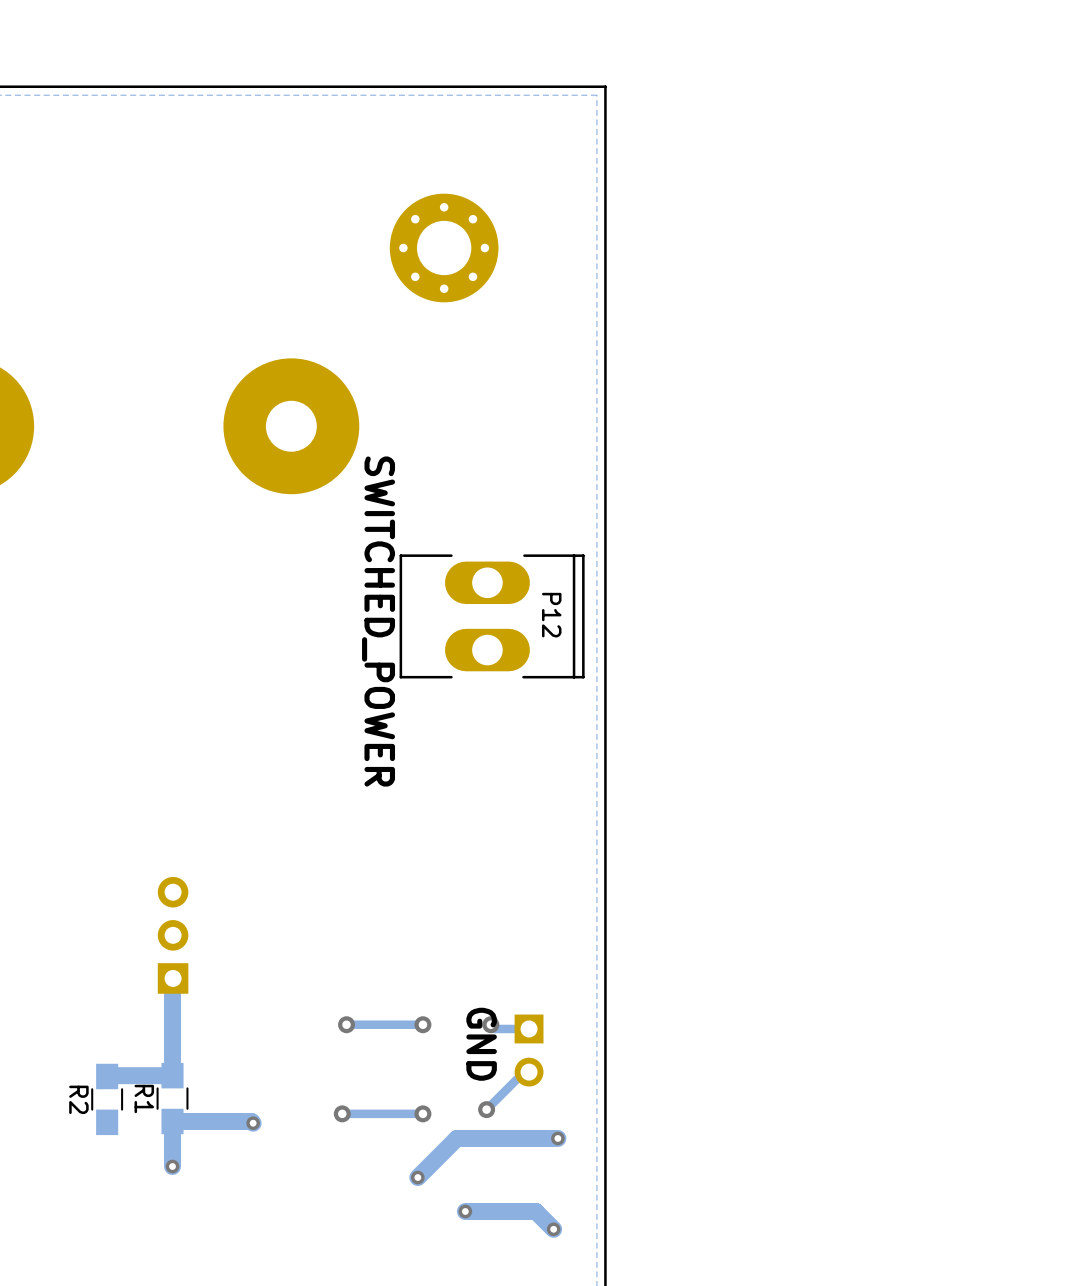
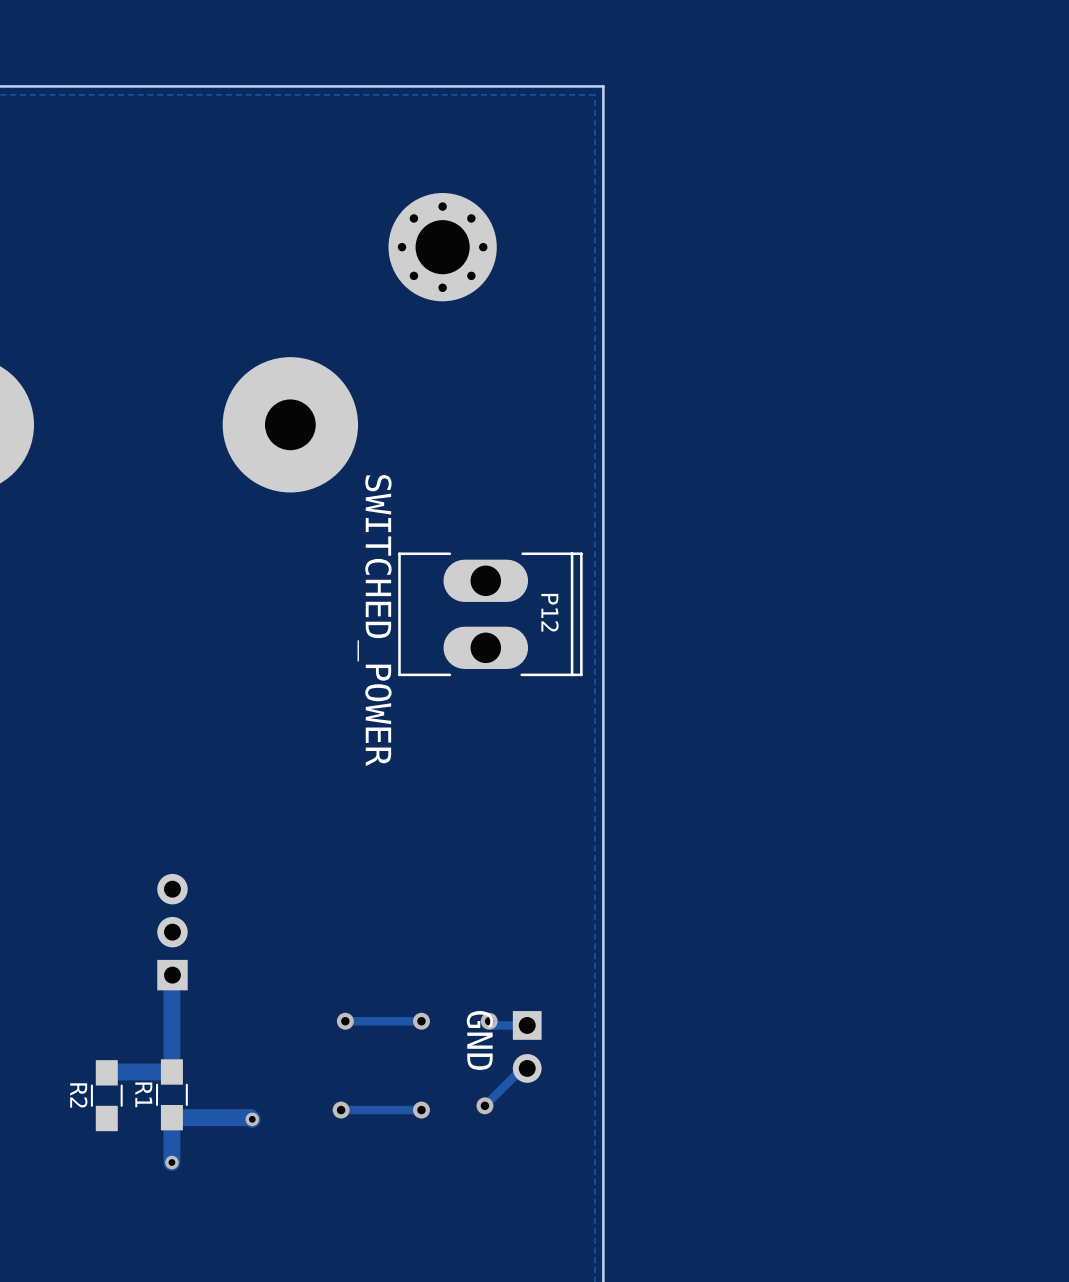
track: (557, 1138) (456, 1138) (417, 1177) -> none
via: (557, 1138) -> none
via: (417, 1177) -> none
track: (465, 1211) (535, 1211) (553, 1229) -> none
via: (465, 1211) -> none
via: (553, 1229) -> none

